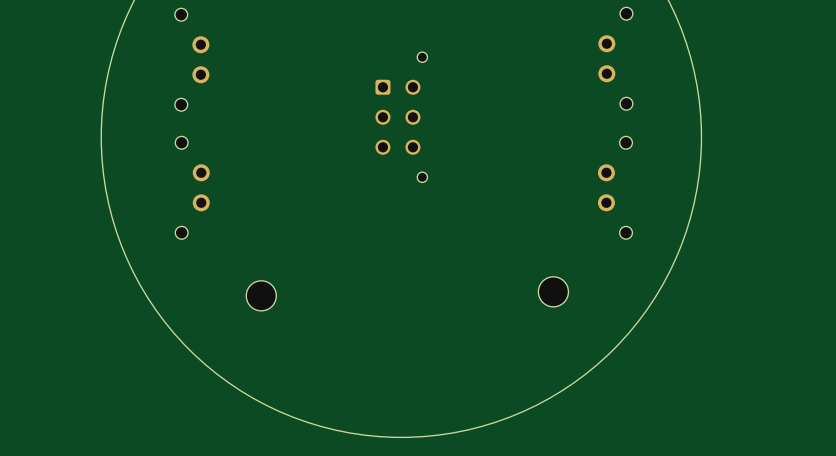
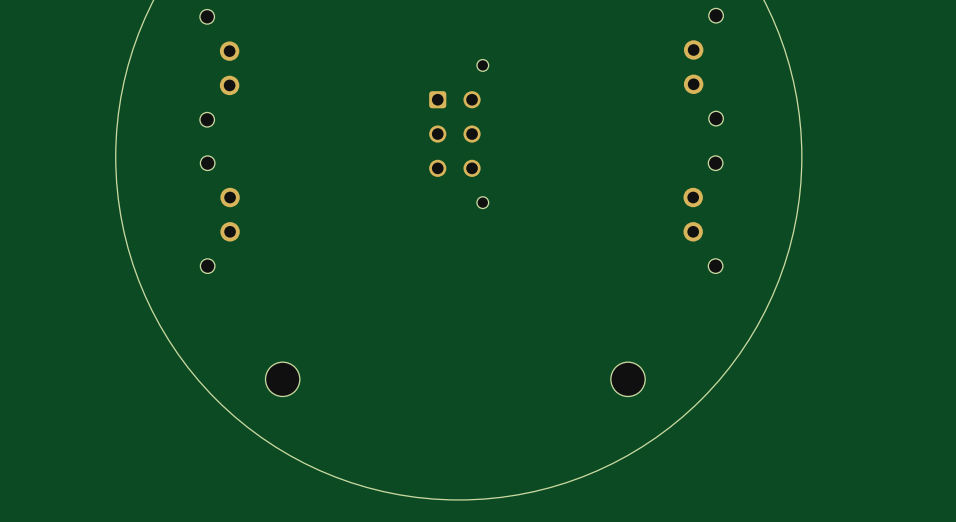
part position: (553, 291) -> (628, 379)
part position: (261, 295) -> (282, 379)

